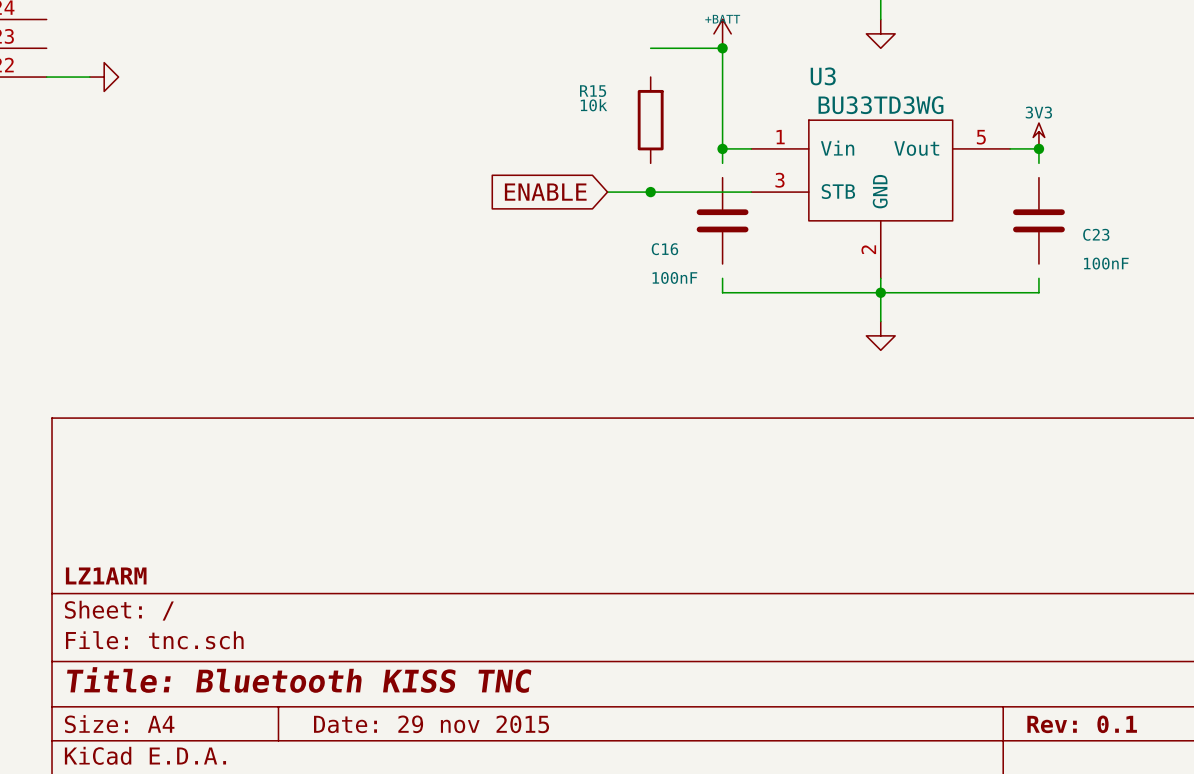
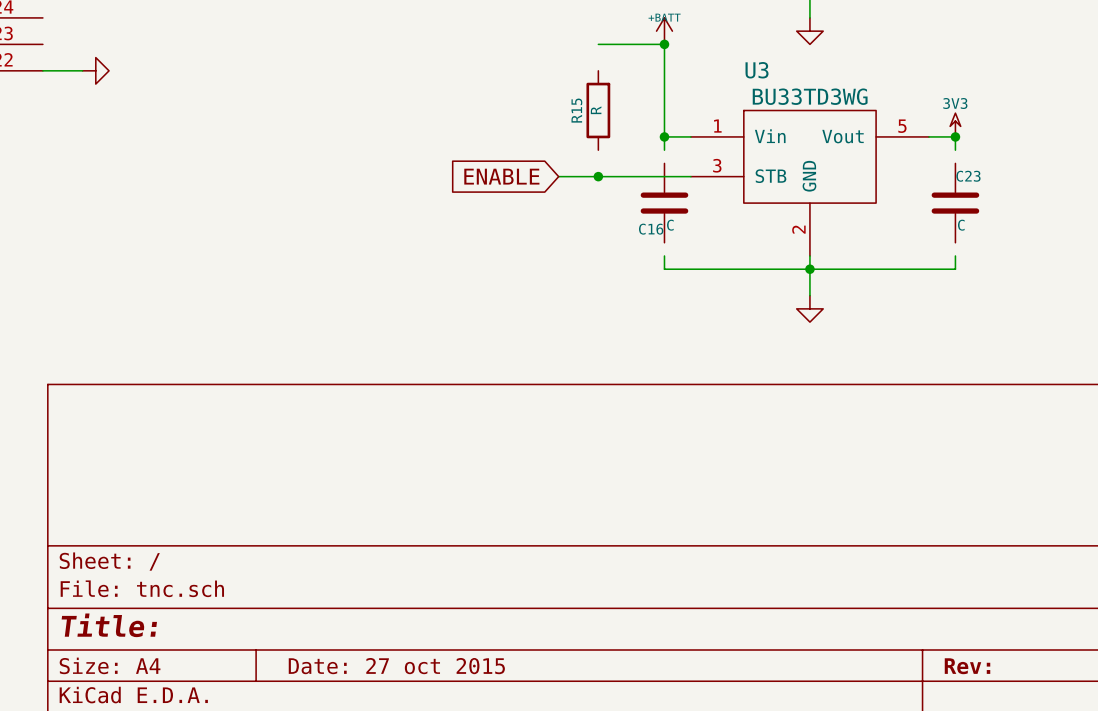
R15 name rotation: 0° (593, 91) -> 90° counterclockwise (576, 110)
R15 name position: R15 (593, 91) -> R15 (576, 110)
R15 value: 10k (593, 105) -> R (596, 110)
C23 name position: C23 (1096, 234) -> C23 (968, 176)
C16 name position: C16 (664, 249) -> C16 (651, 229)
C23 value: 100nF (1106, 263) -> C (961, 225)
C16 value: 100nF (674, 277) -> C (670, 225)
title block: LZ1ARM (106, 575) -> none
title block: Title: Bluetooth KISS TNC (299, 679) -> Title: (109, 625)
title block: Date: 29 nov 2015 (431, 724) -> Date: 27 oct 2015 (396, 666)
title block: Rev: 0.1 (1082, 724) -> Rev: (967, 666)

